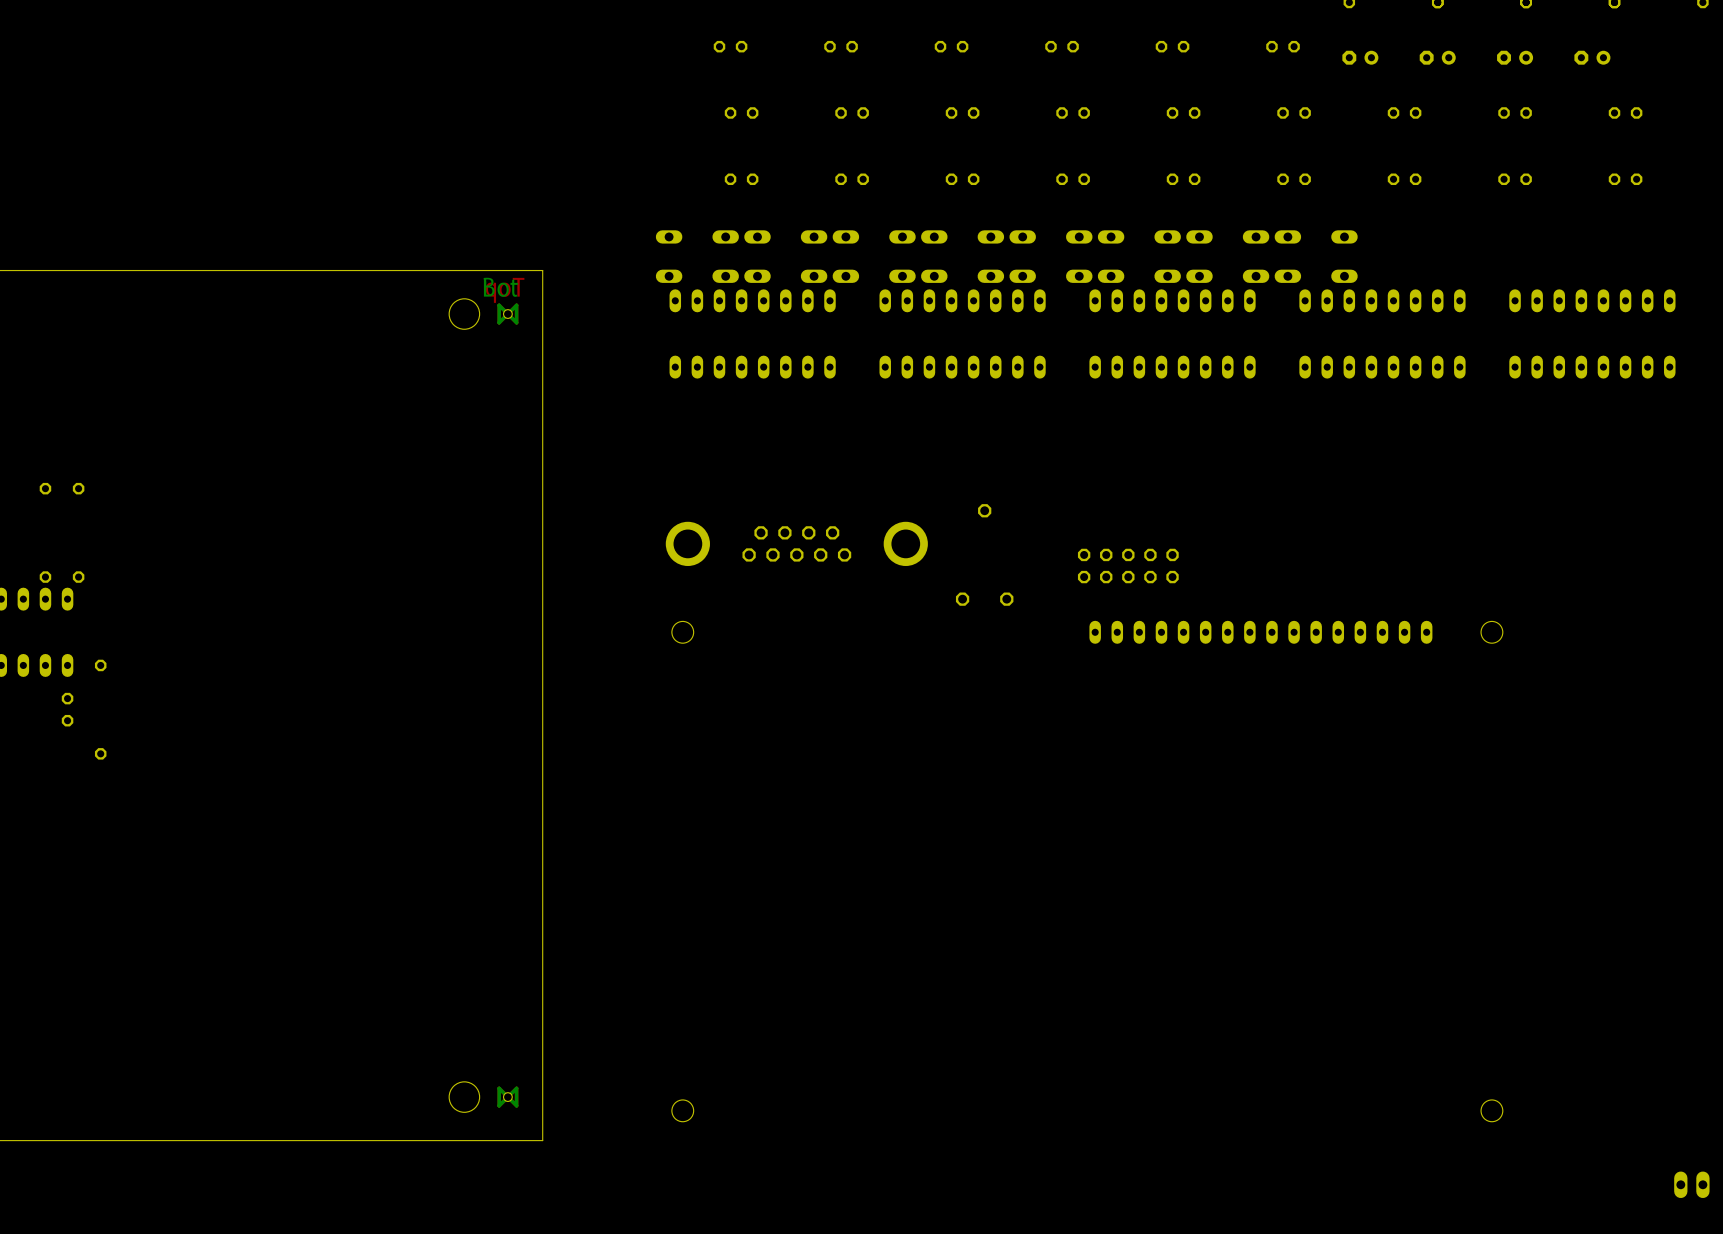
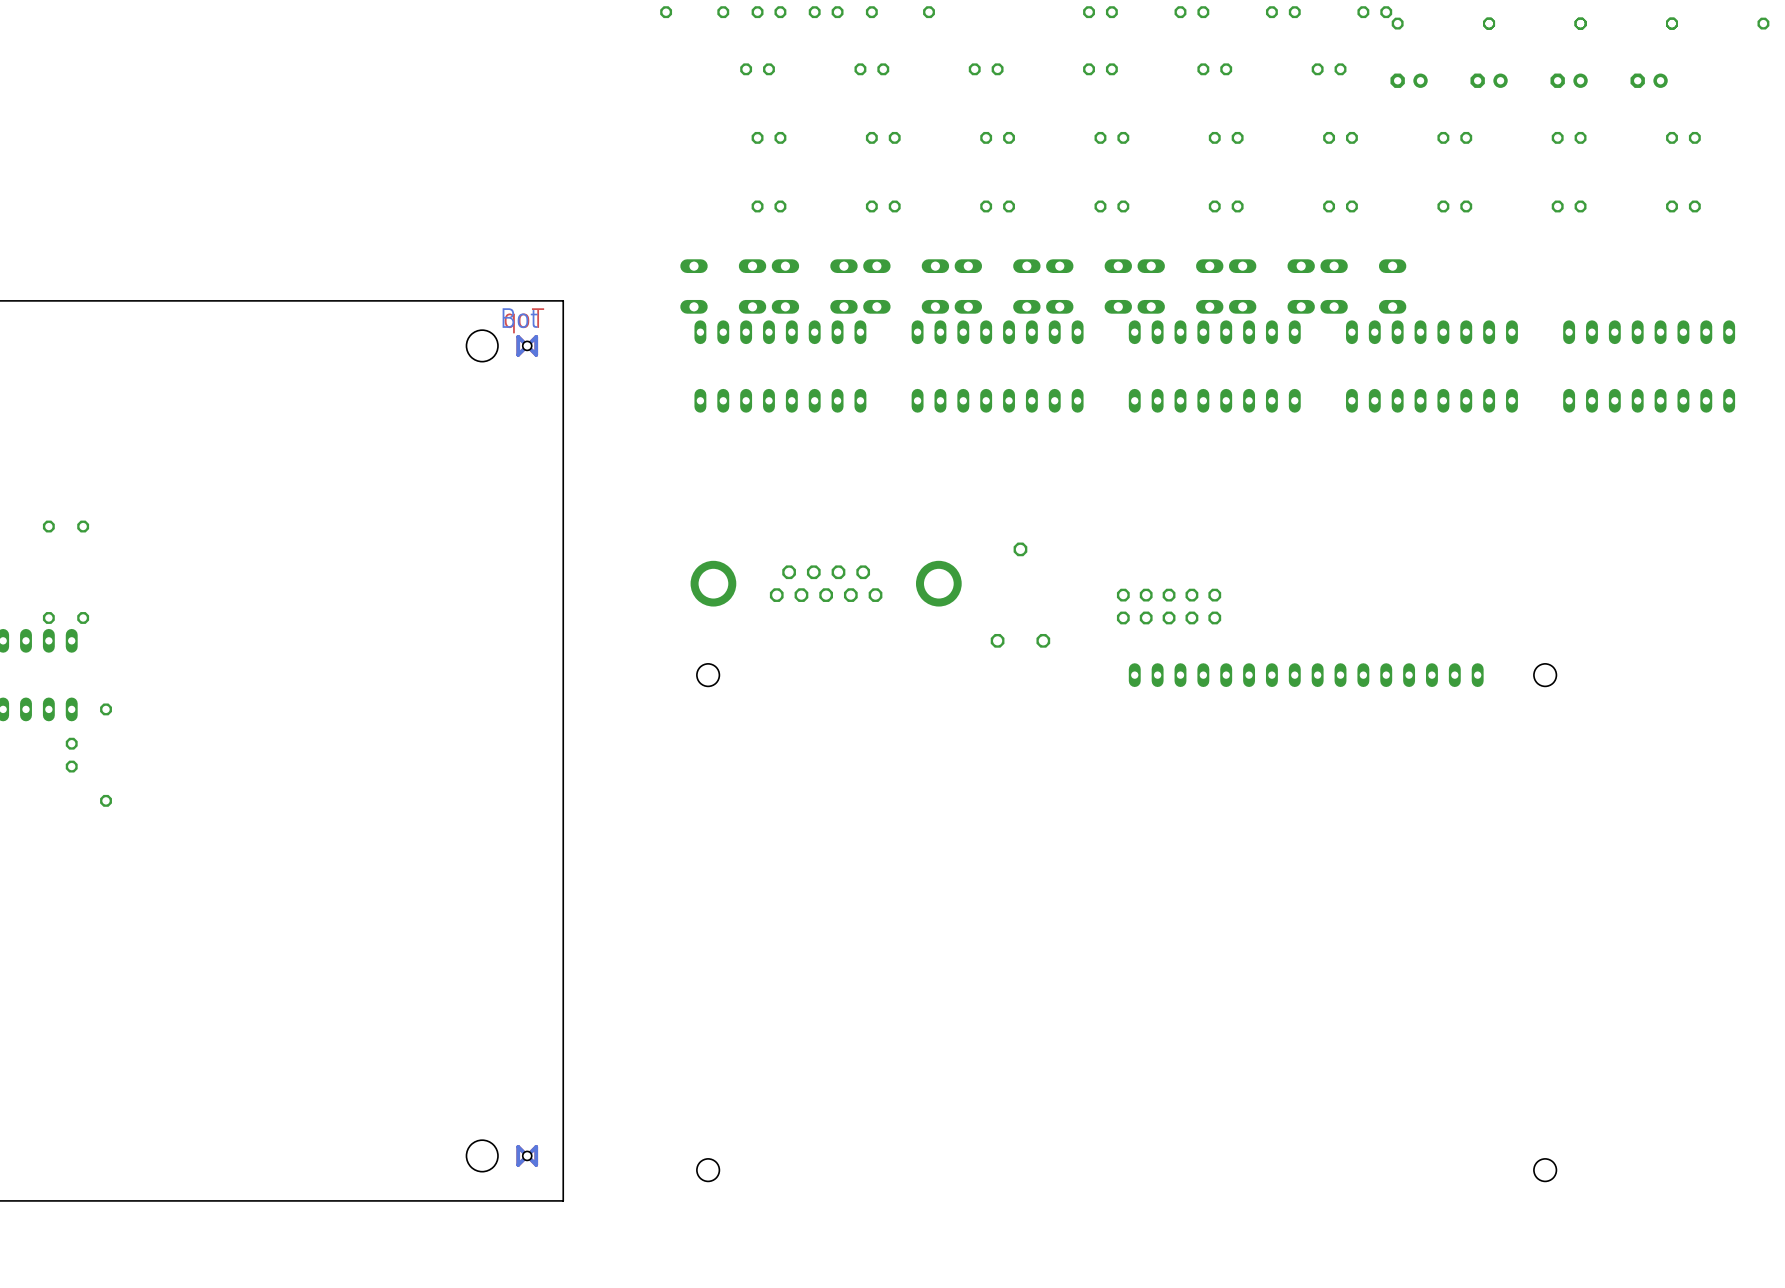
part: (1691, 1184) -> none

